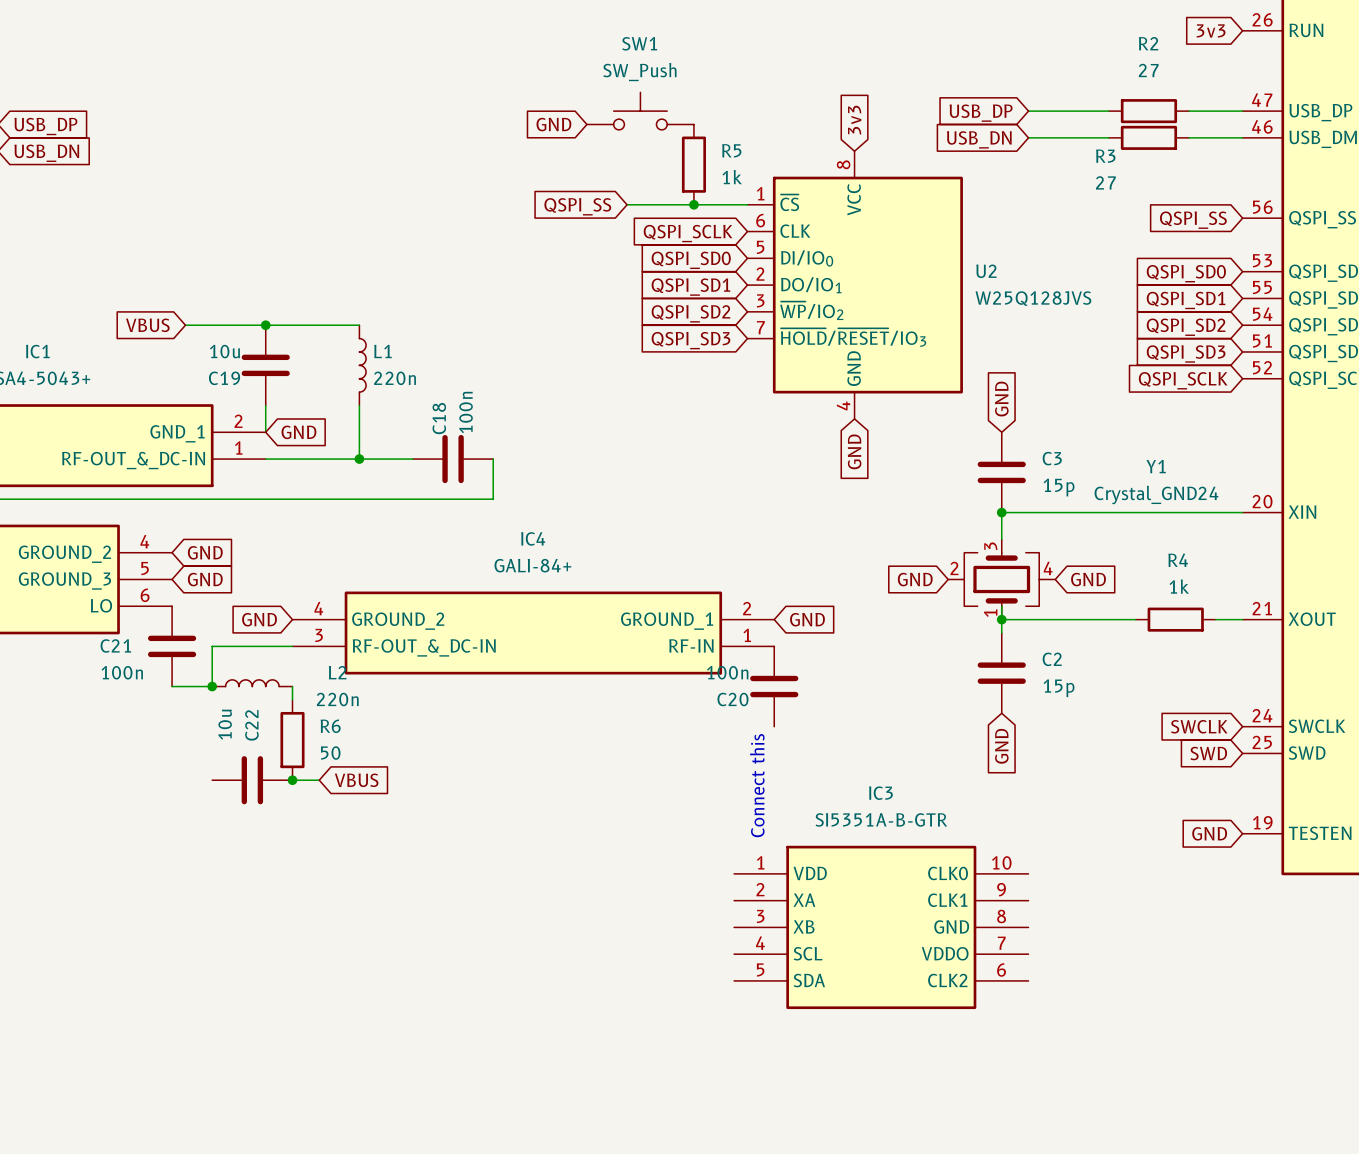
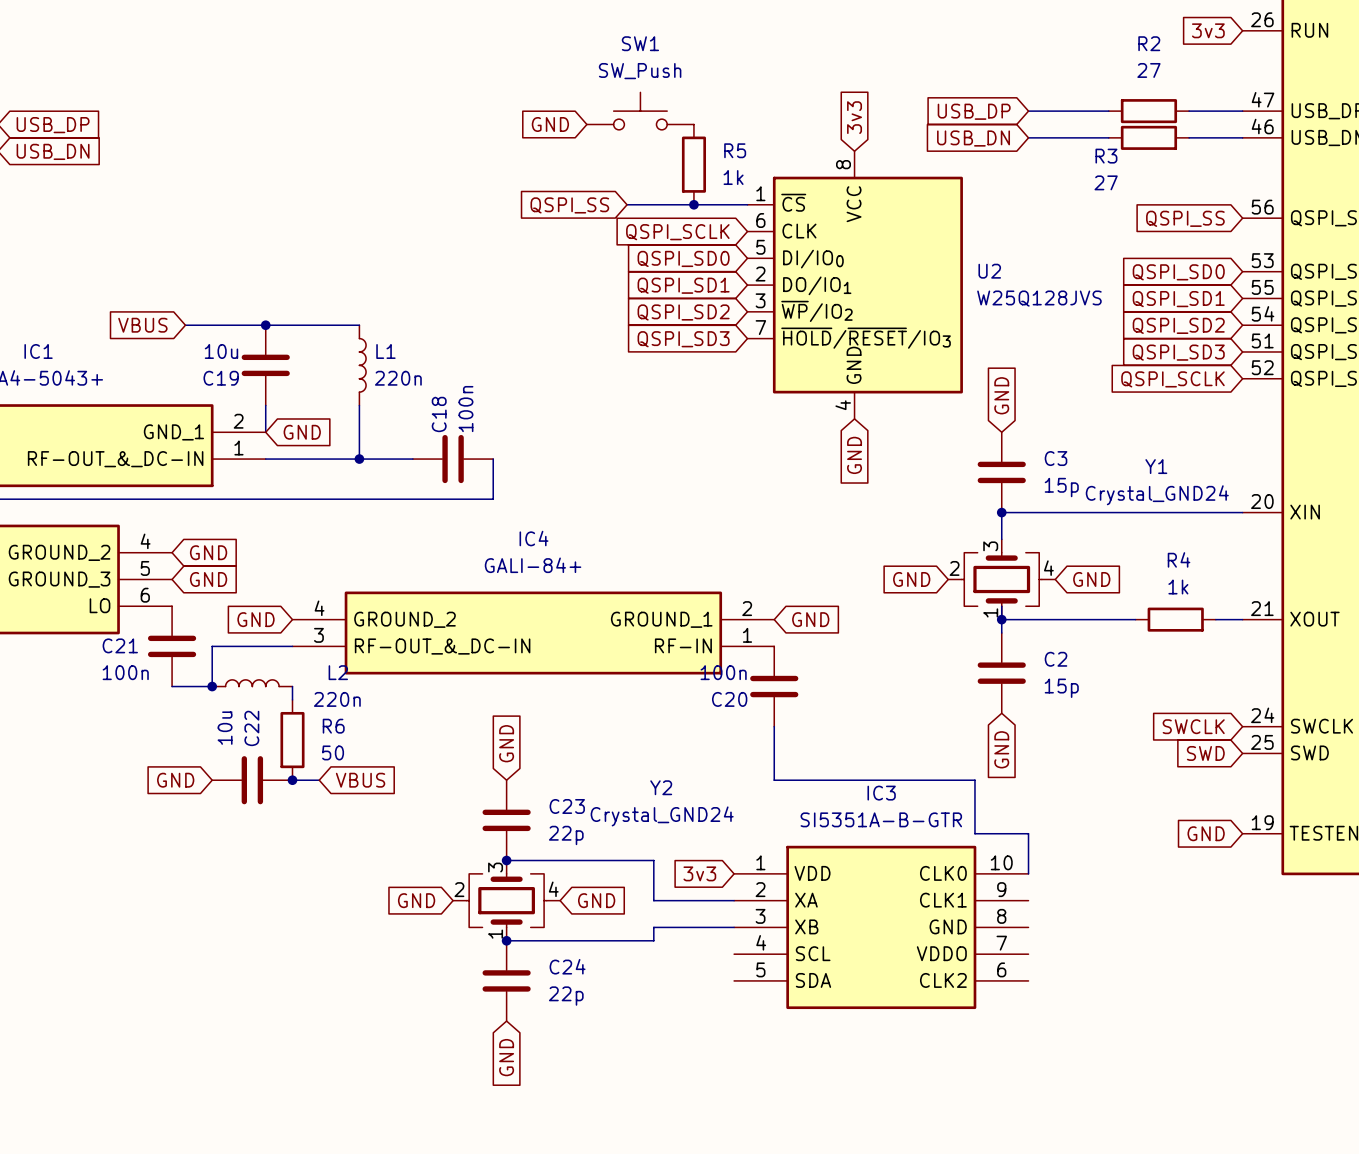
wire: none -> (774, 726) (774, 780) (974, 780) (974, 833) (1028, 833) (1028, 873)
global label: none -> GND (506, 743)
global label: none -> GND (175, 780)
text: Connect this (757, 785) -> none
C23: none -> 22p (506, 820)
wire: none -> (506, 860) (653, 860) (653, 900) (734, 900)
junction: none -> (506, 860)
global label: none -> 3v3 (699, 873)
global label: none -> GND (416, 900)
Y2: none -> Crystal_GND24 (506, 900)
global label: none -> GND (596, 900)
wire: none -> (734, 927) (653, 927) (653, 940) (506, 940)
junction: none -> (506, 940)
C24: none -> 22p (506, 980)
global label: none -> GND (506, 1057)

